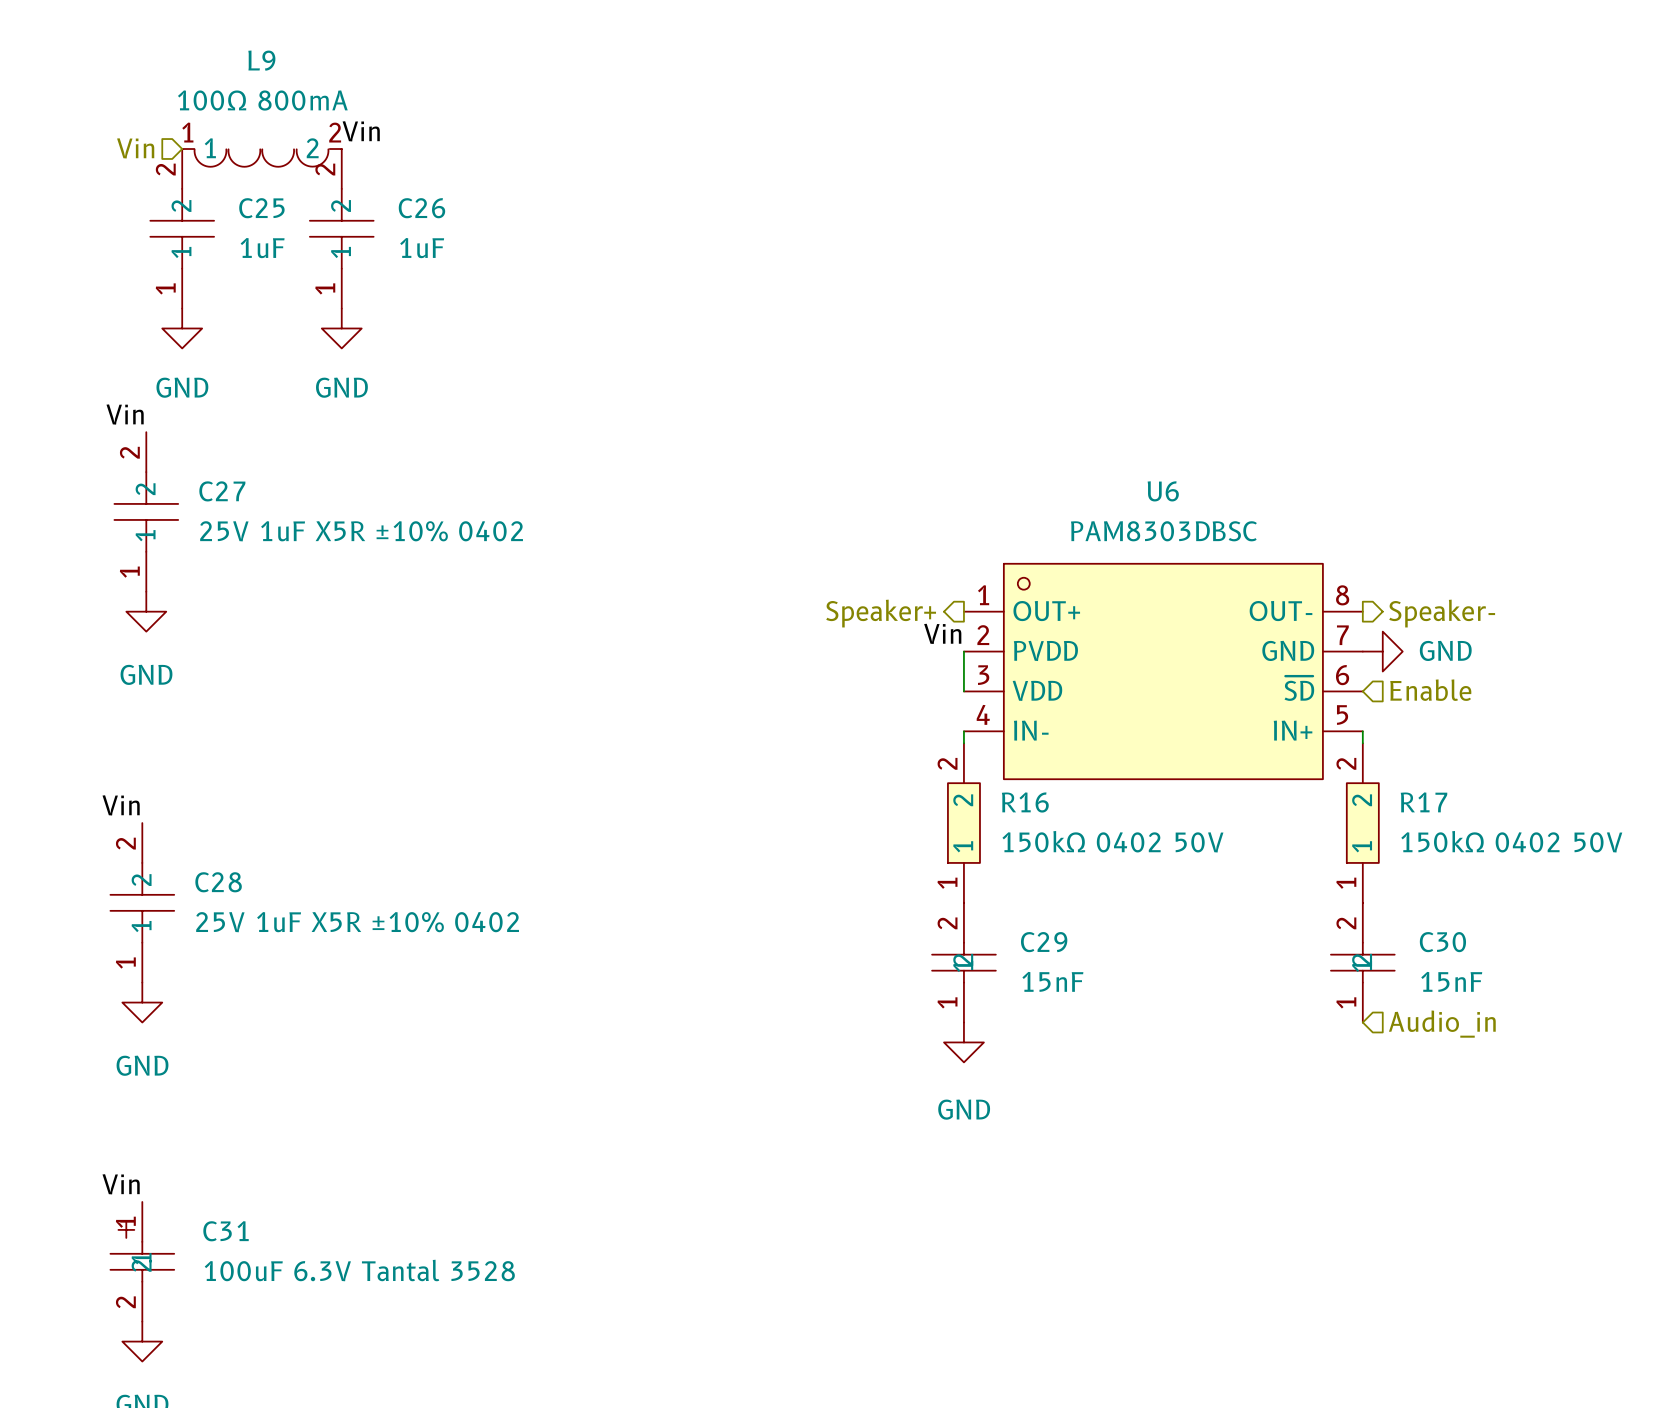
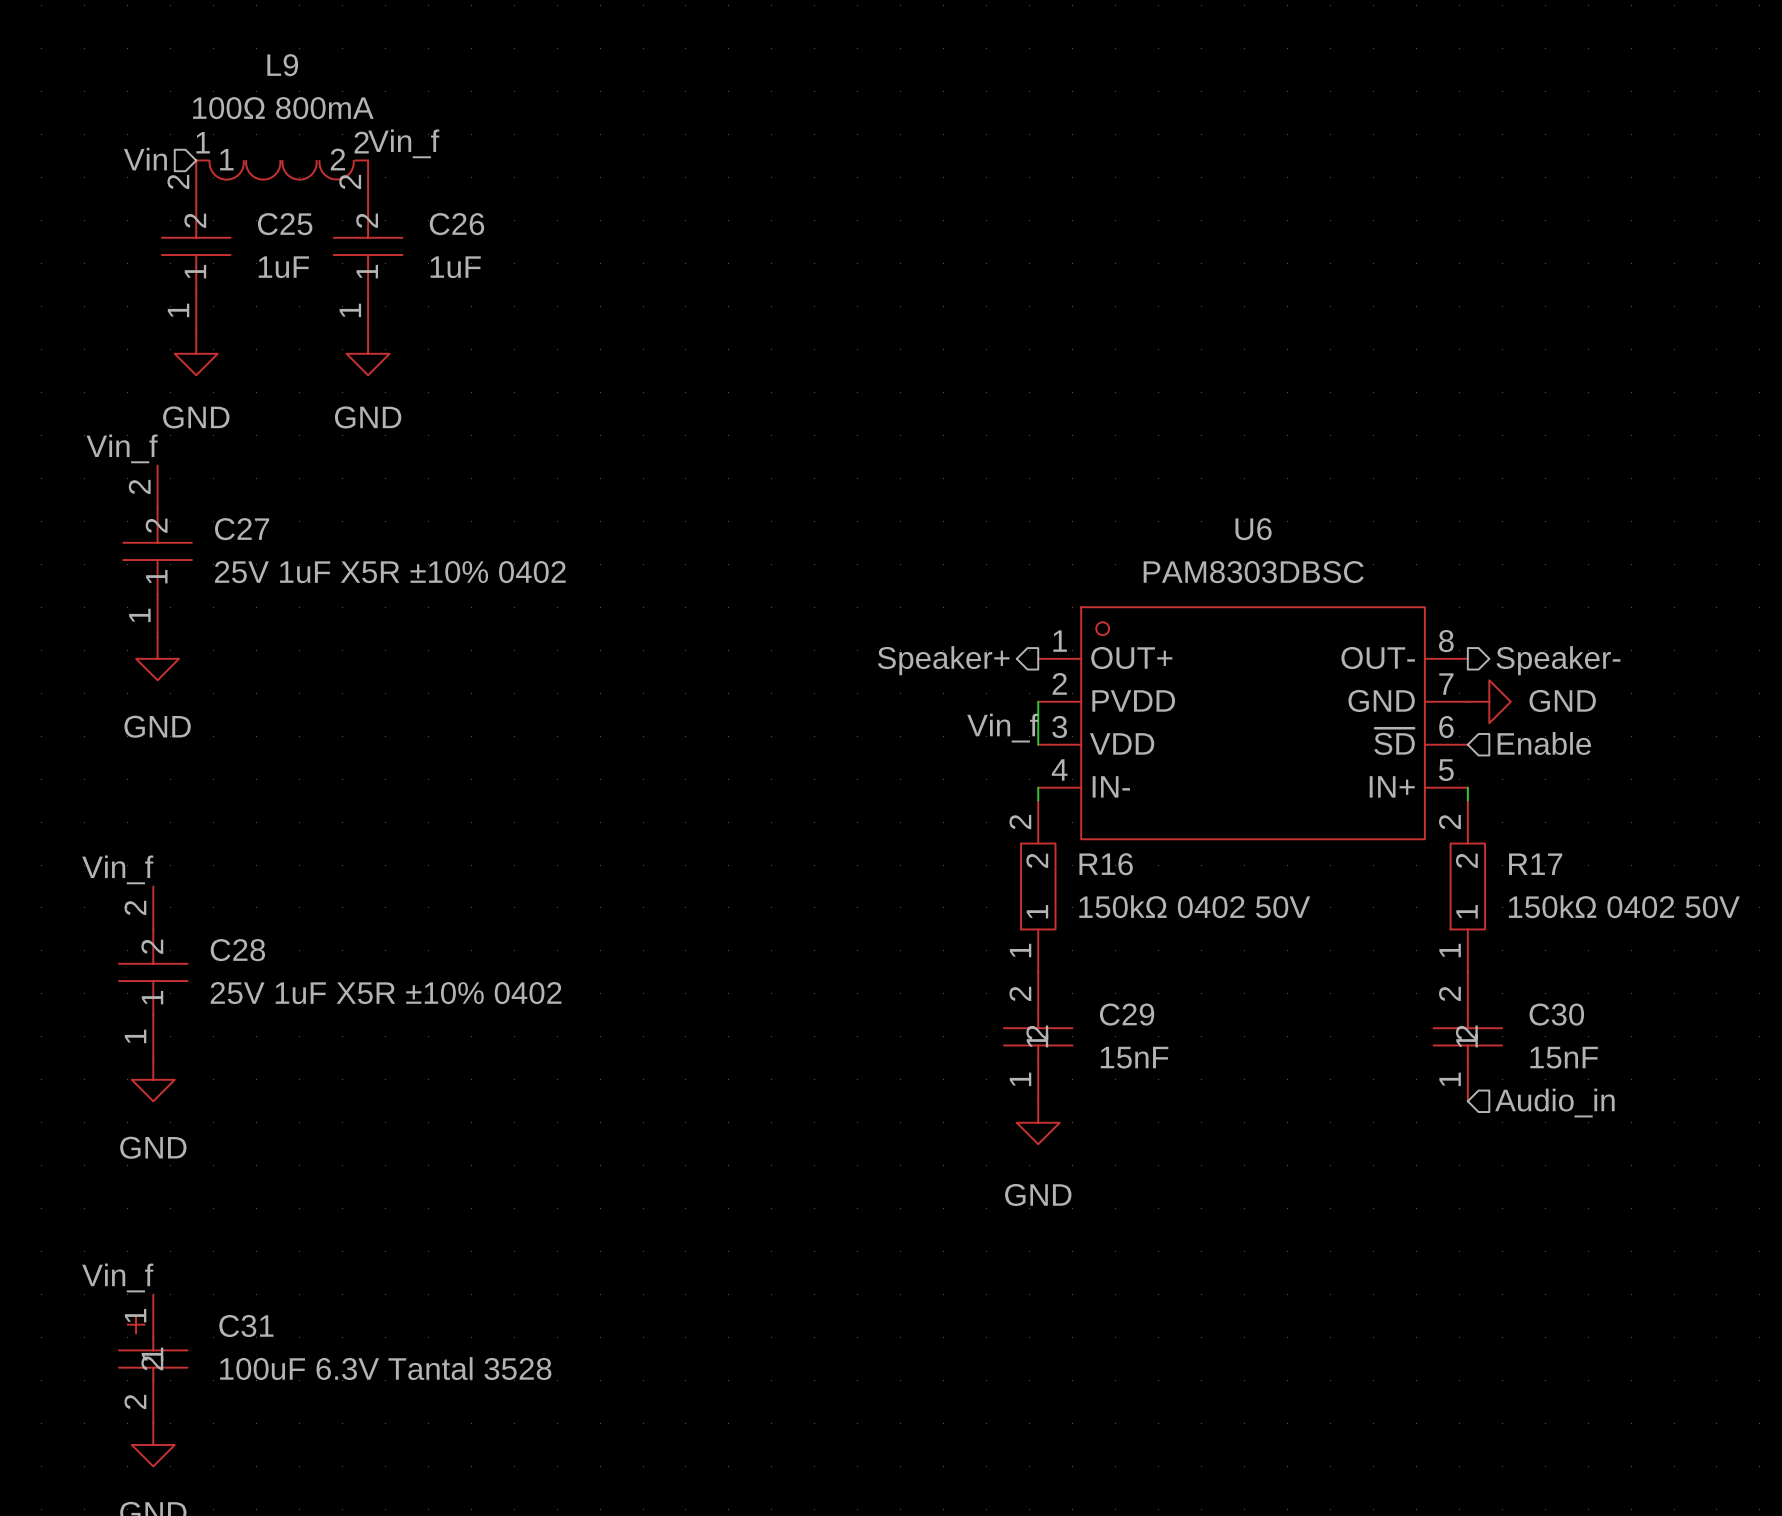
label: Vin (361, 131) -> Vin_f (403, 143)
label: Vin (125, 414) -> Vin_f (122, 448)
label: Vin (942, 633) -> Vin_f (1002, 728)
label: Vin (121, 805) -> Vin_f (117, 869)
label: Vin (121, 1184) -> Vin_f (117, 1277)

